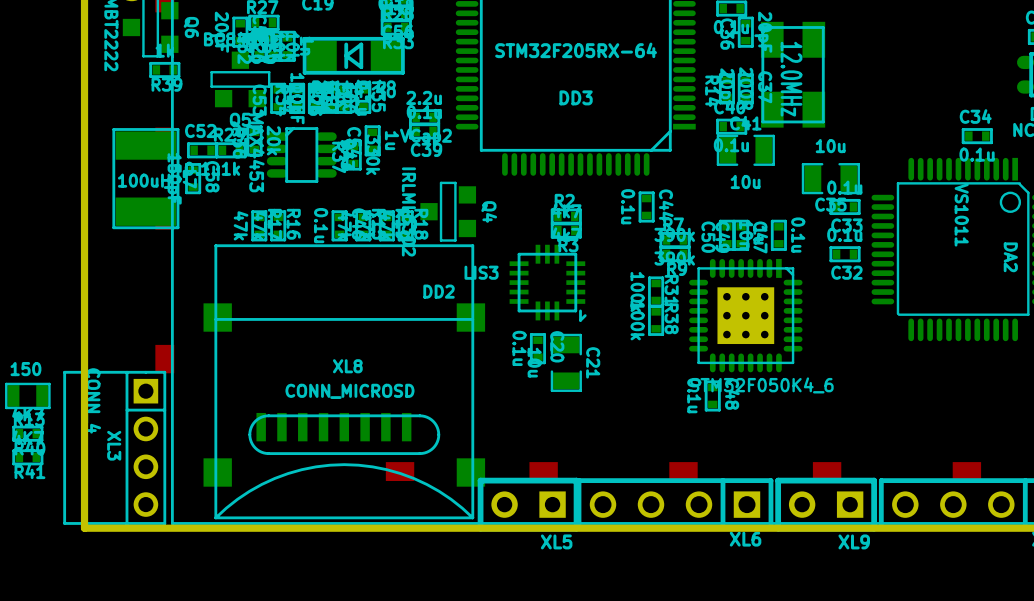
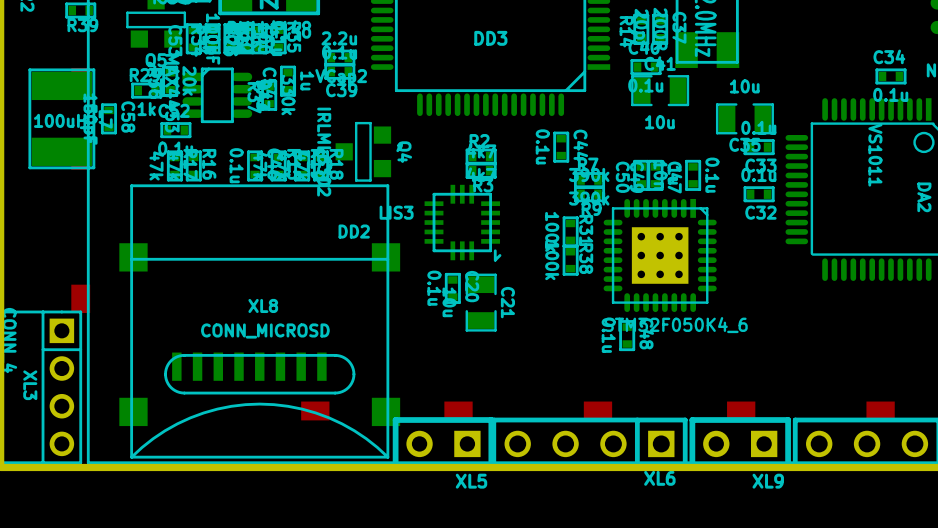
C52 position: (202, 150) -> (175, 130)

